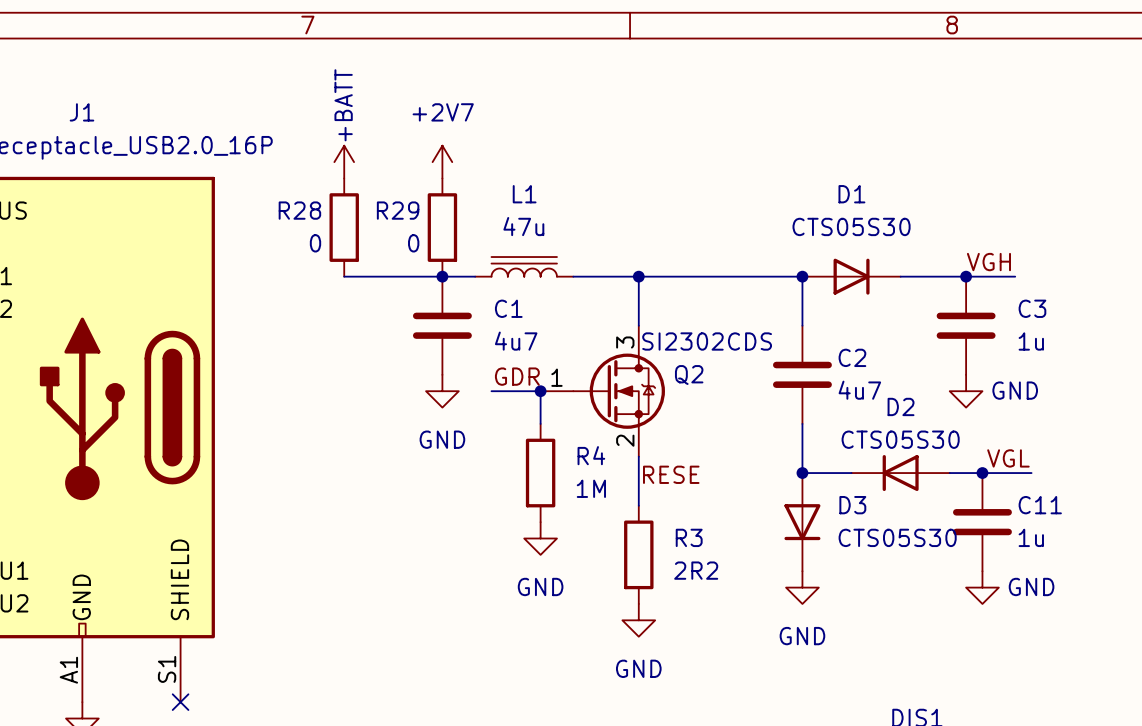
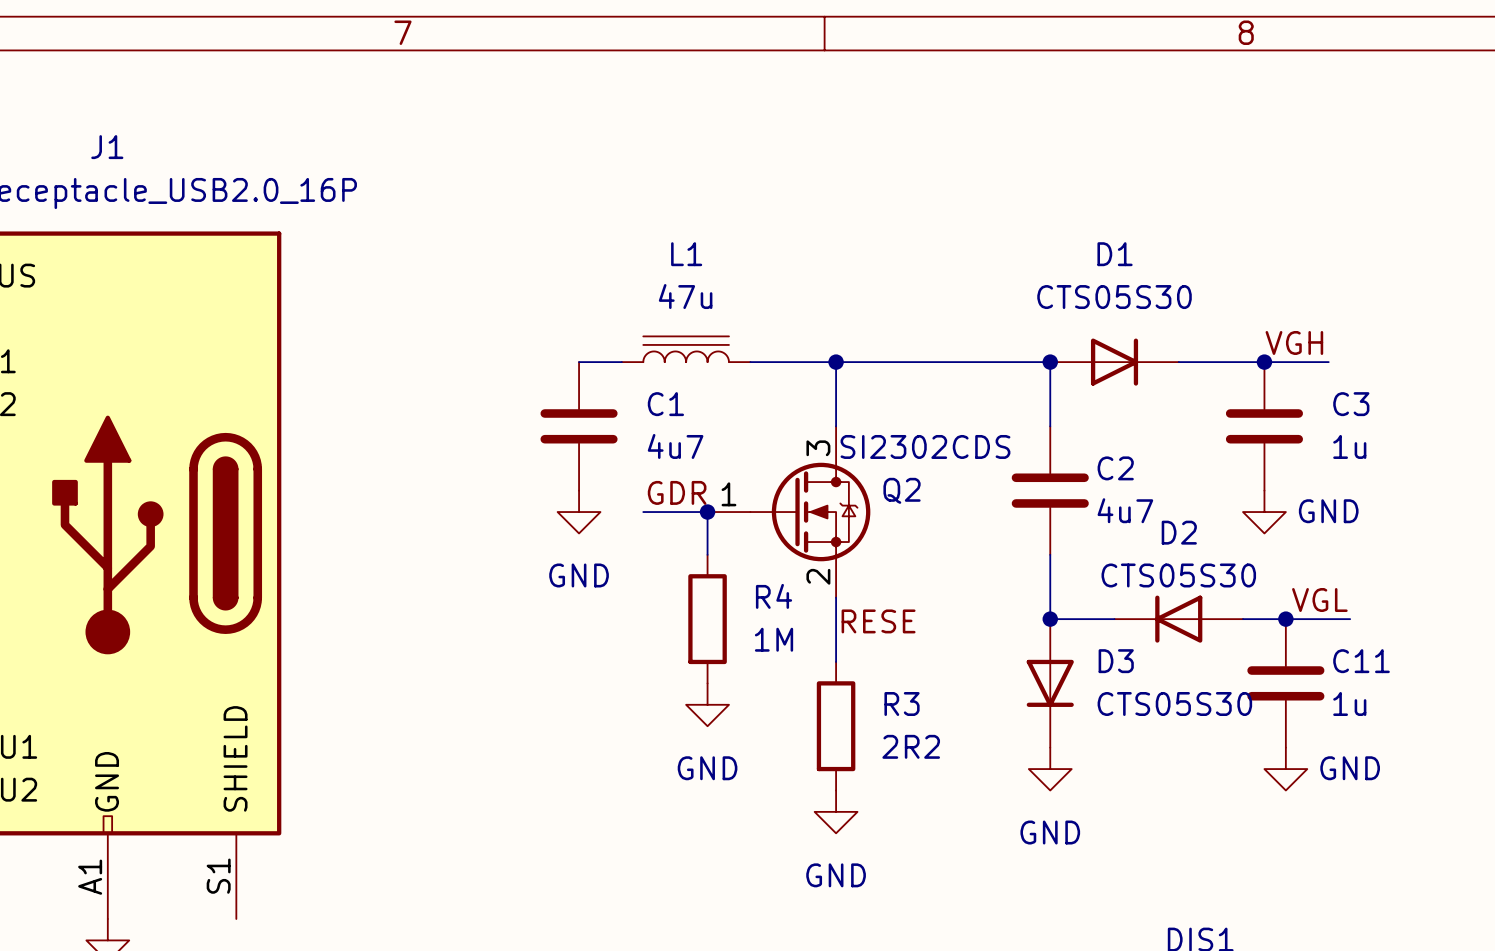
power symbol: +BATT (344, 162) -> none
power symbol: +2V7 (442, 162) -> none
R28: 0 (344, 227) -> none
R29: 0 (442, 227) -> none
wire: (344, 276) (442, 276) -> none
junction: (442, 276) -> none
no-connect mark: (180, 702) -> none

